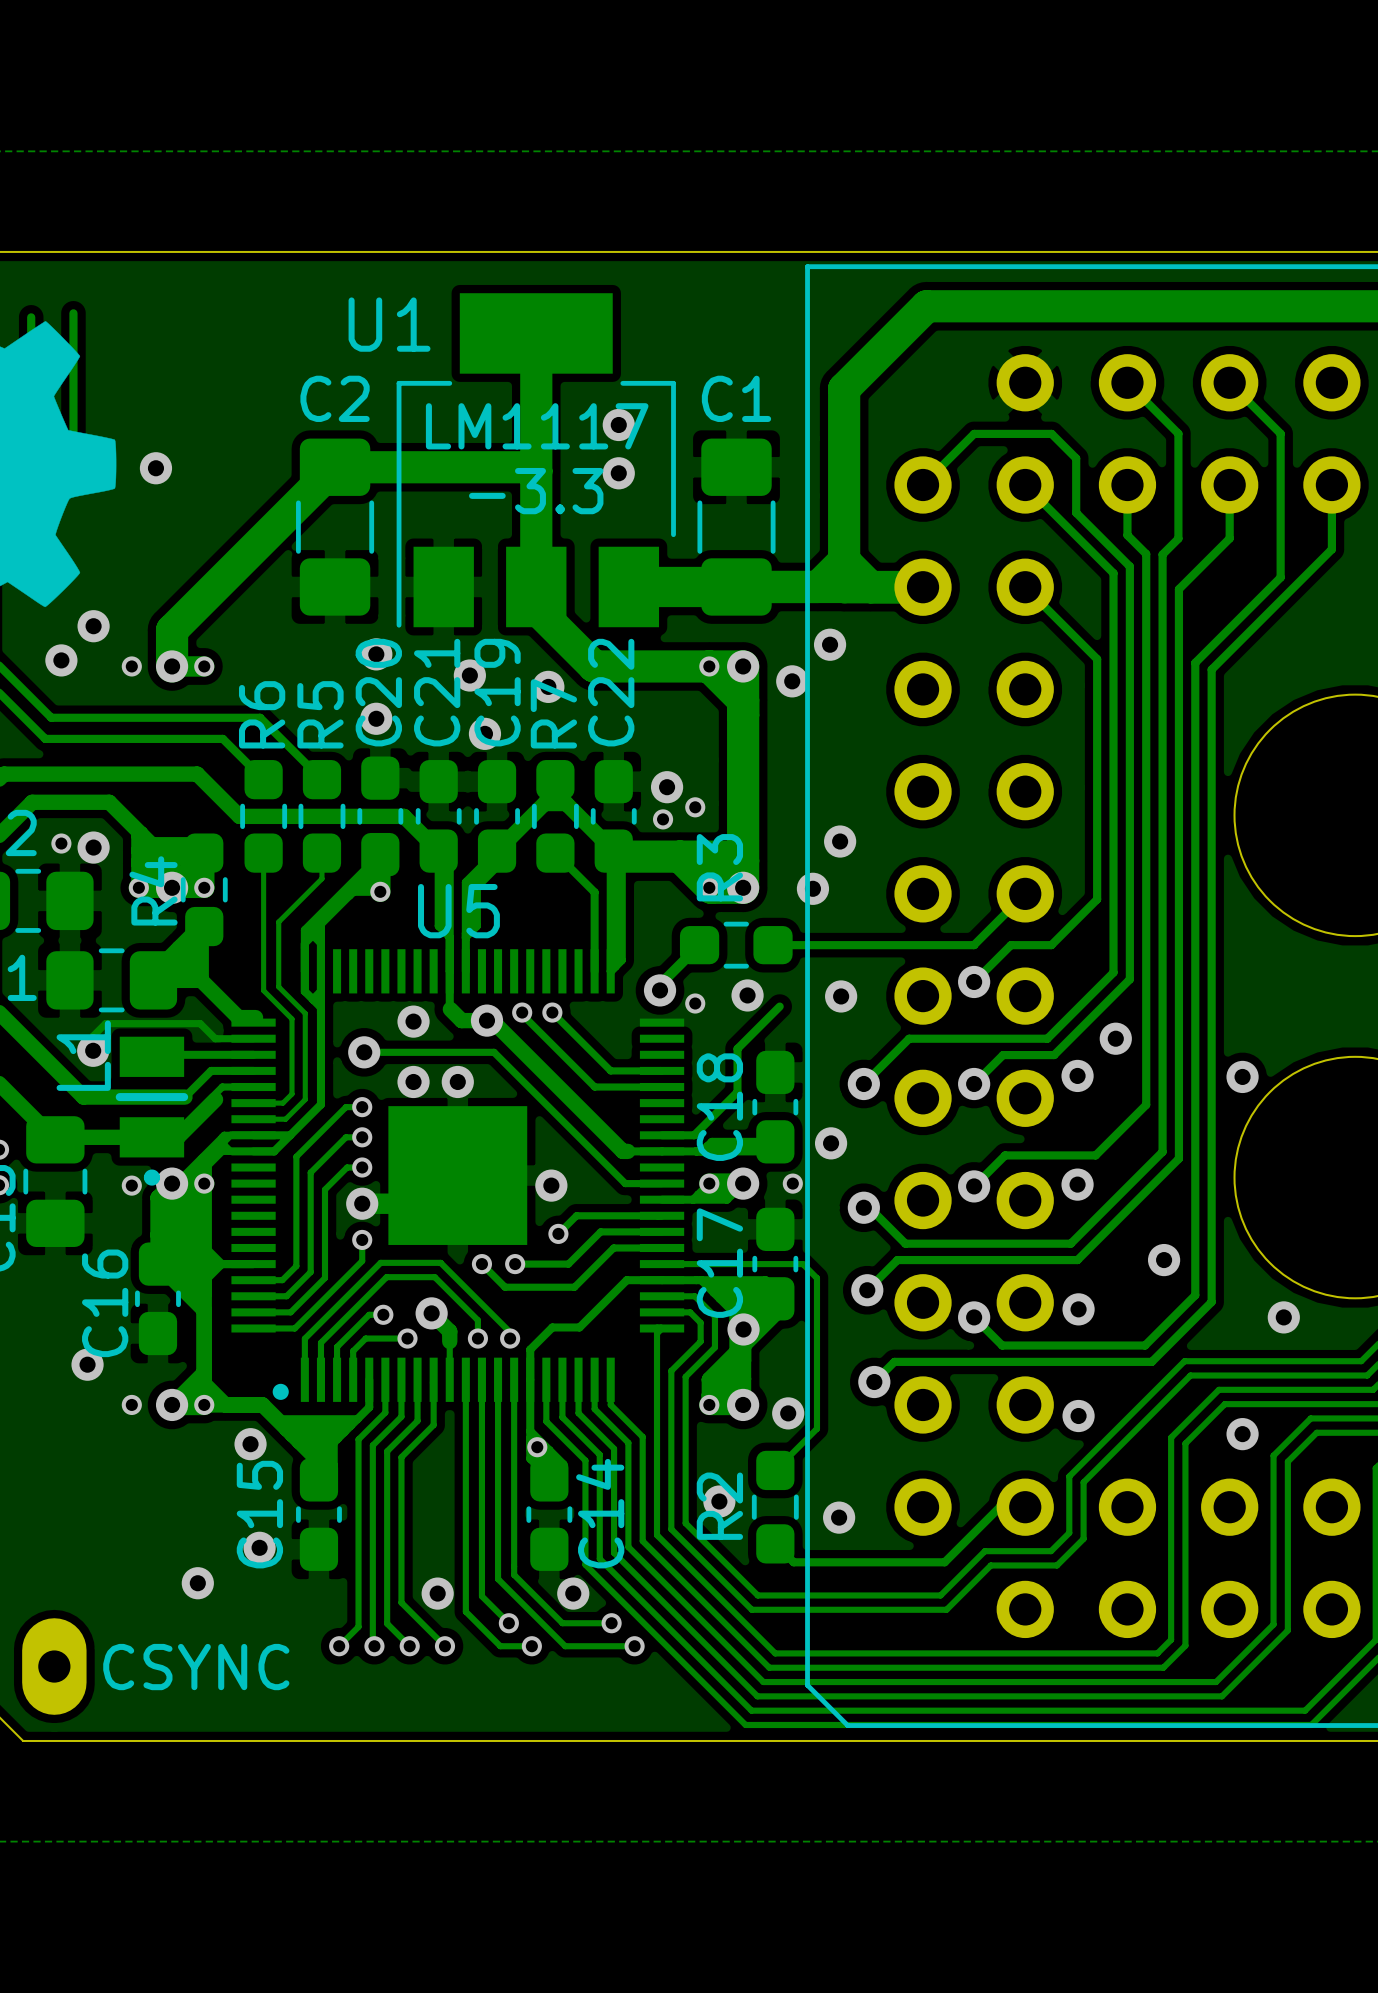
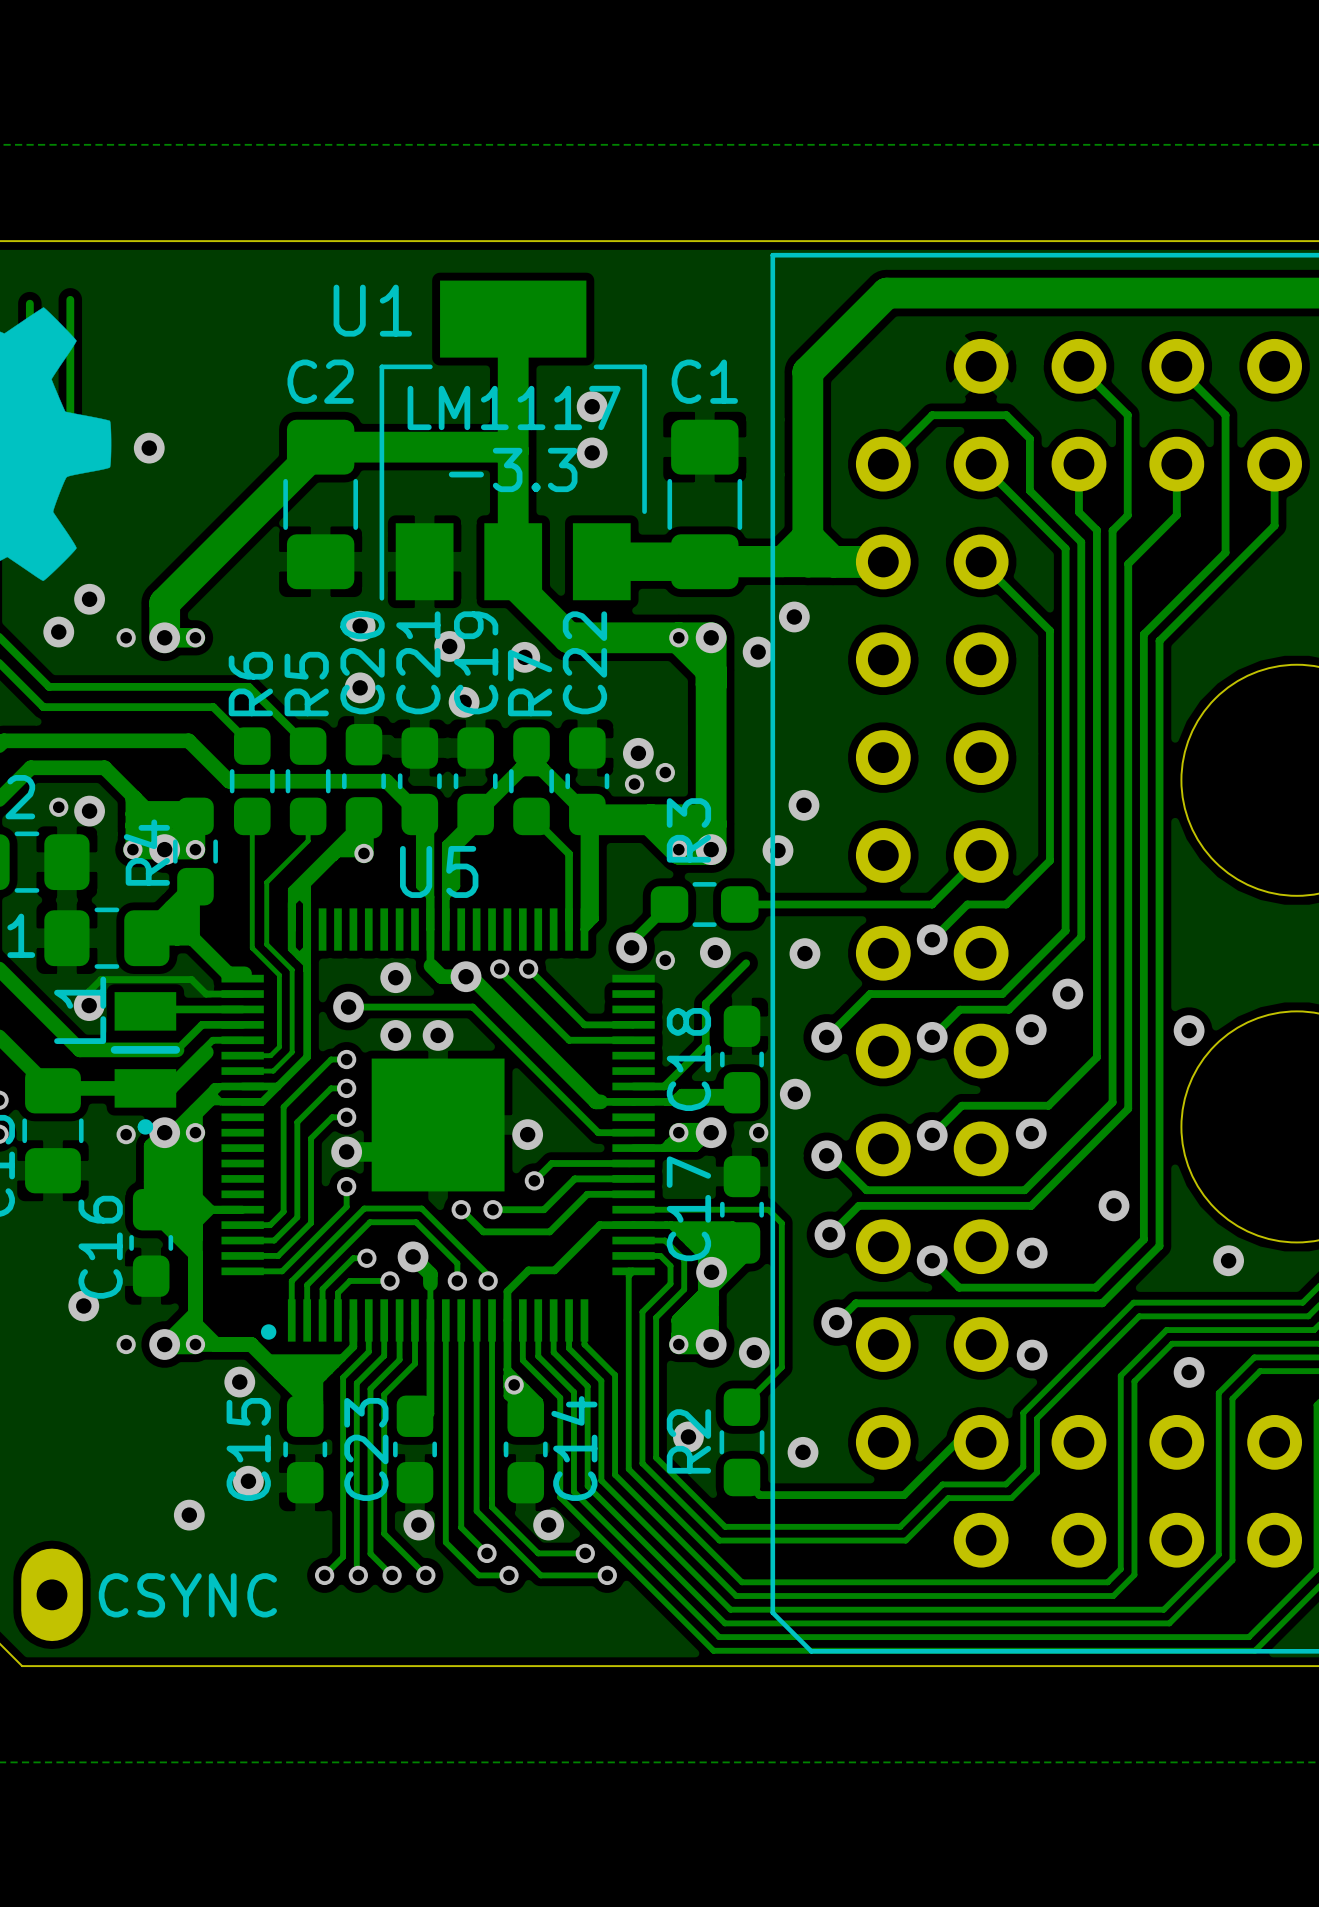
track: none -> (430, 1320) (430, 1413) (428, 1416) (415, 1416)
C23: none -> (415, 1449)

